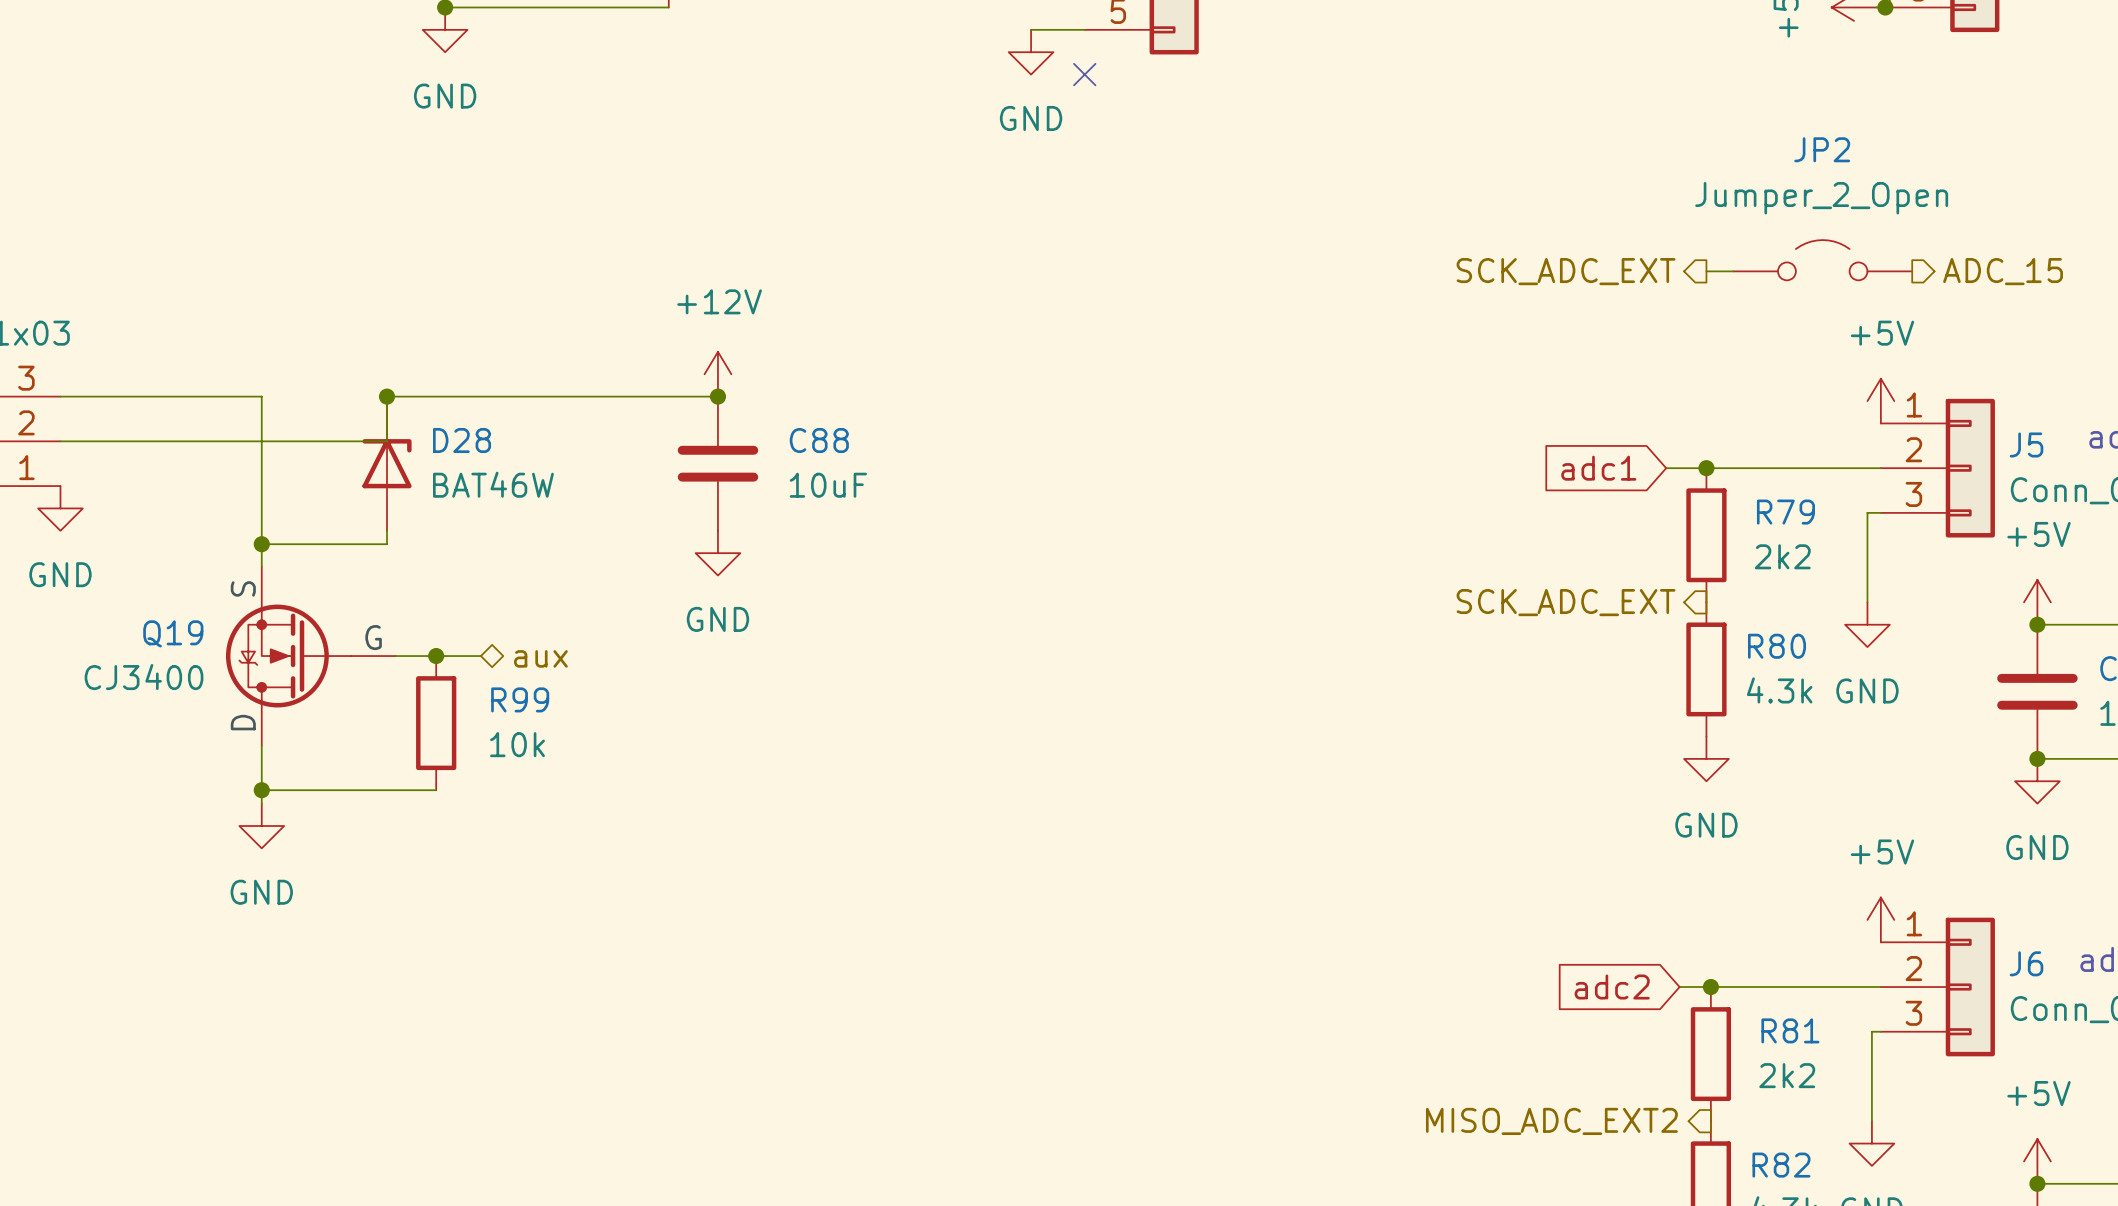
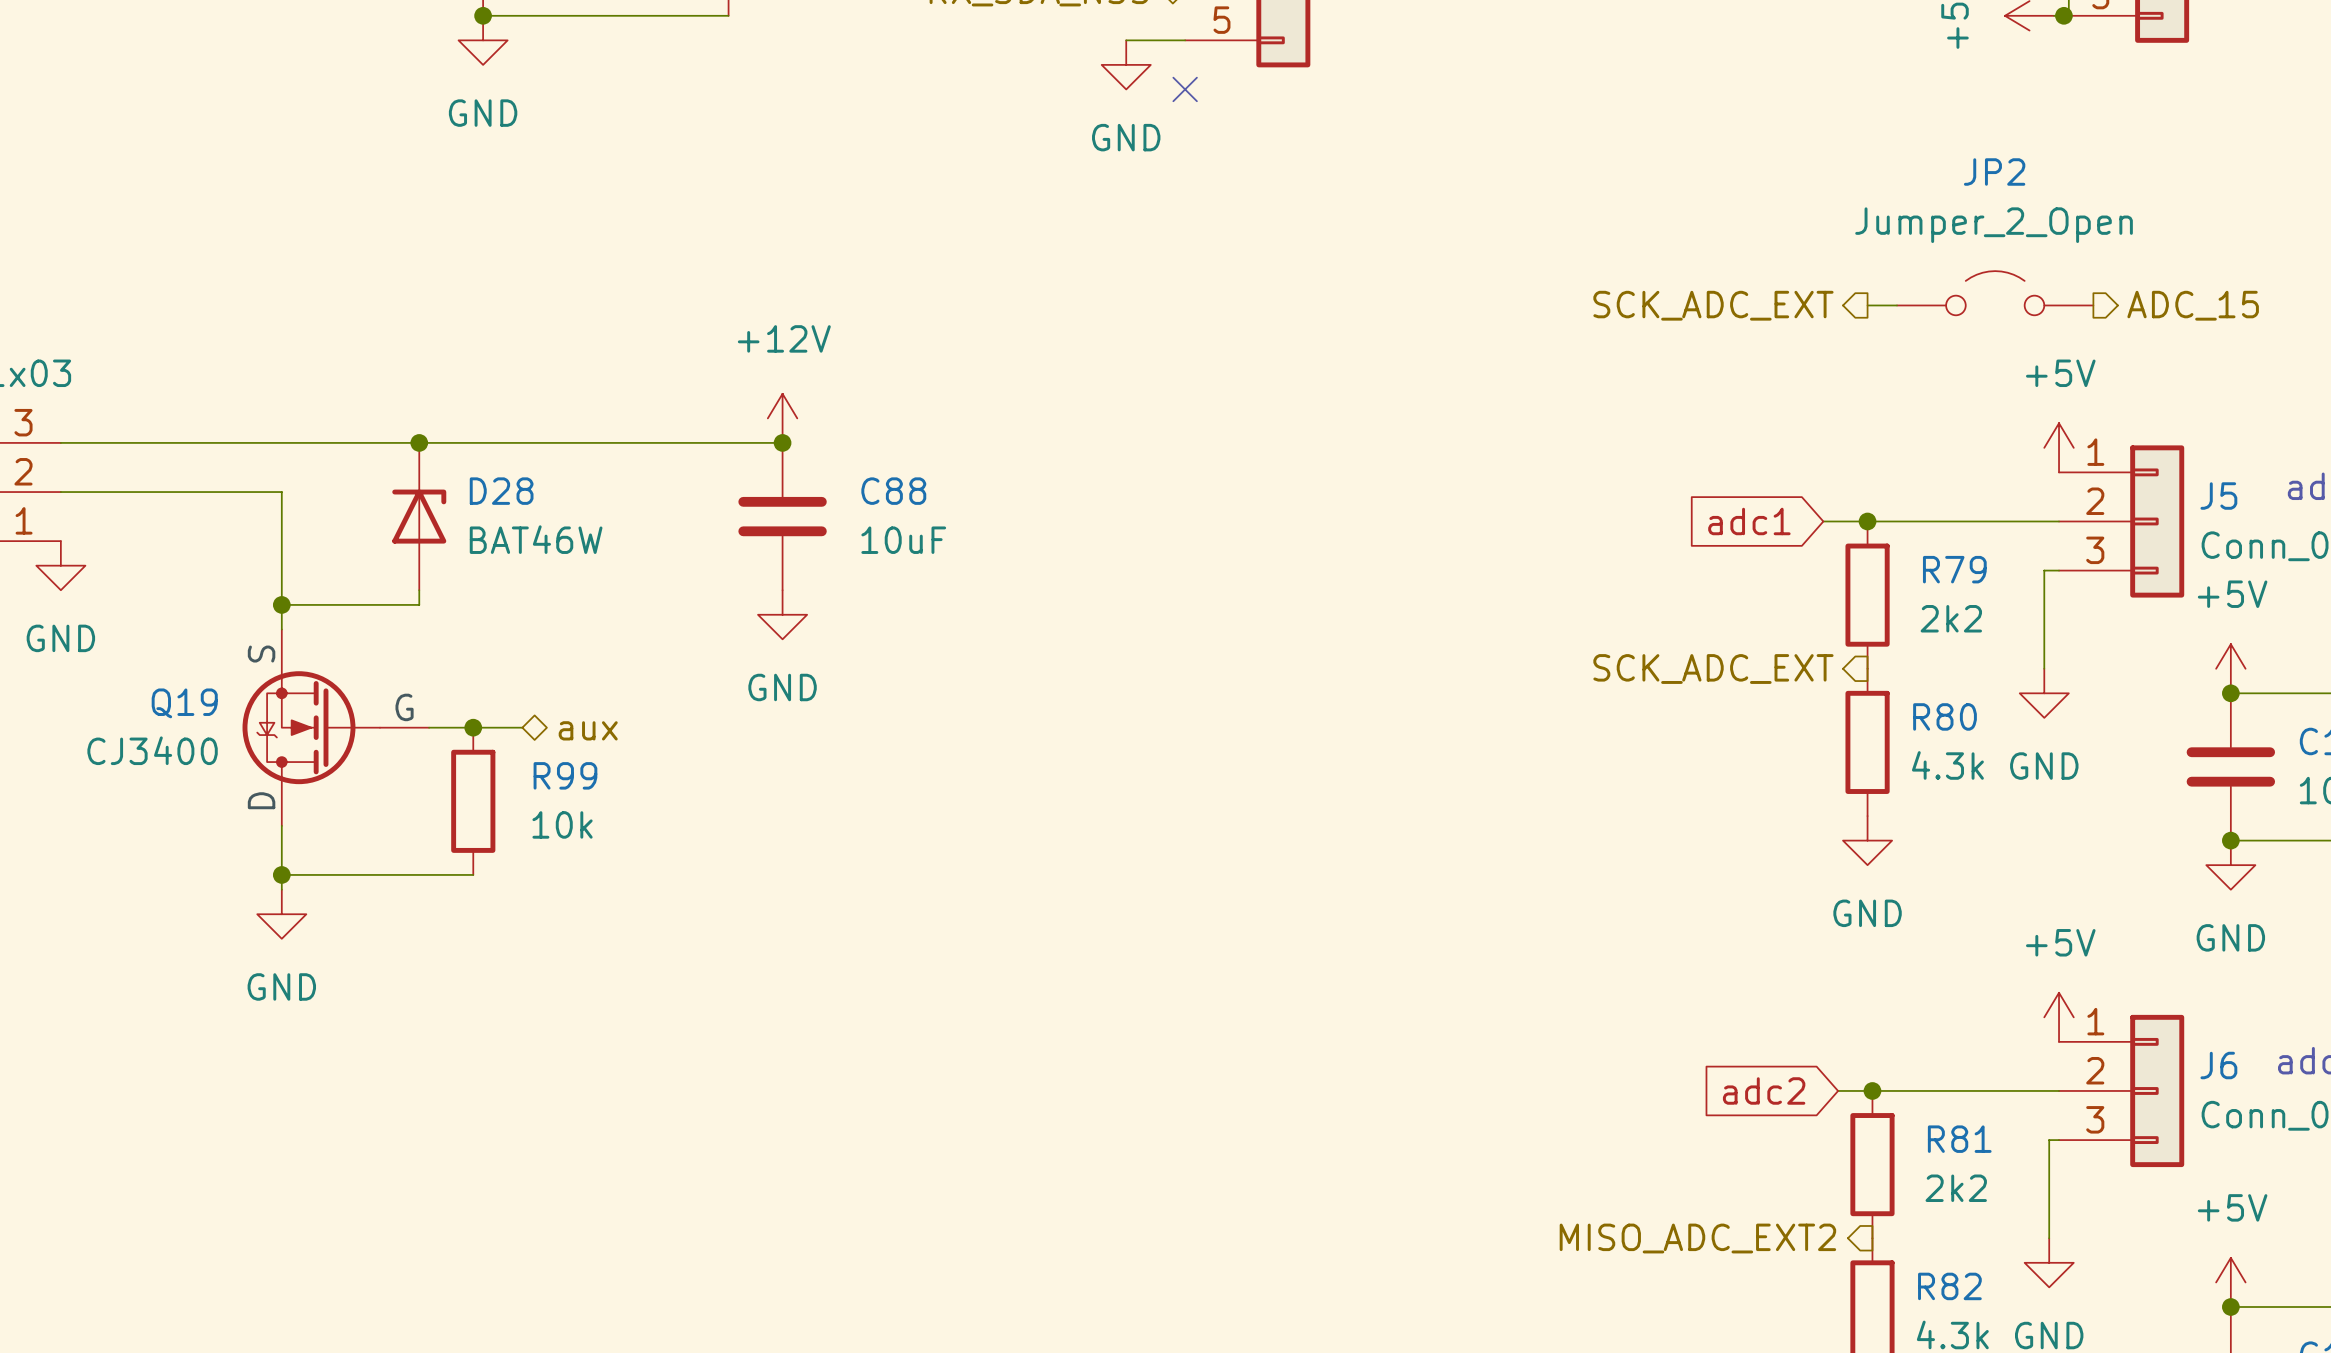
wire: (261, 396) (261, 441) (386, 441) (386, 396) -> (281, 442) (419, 442)

